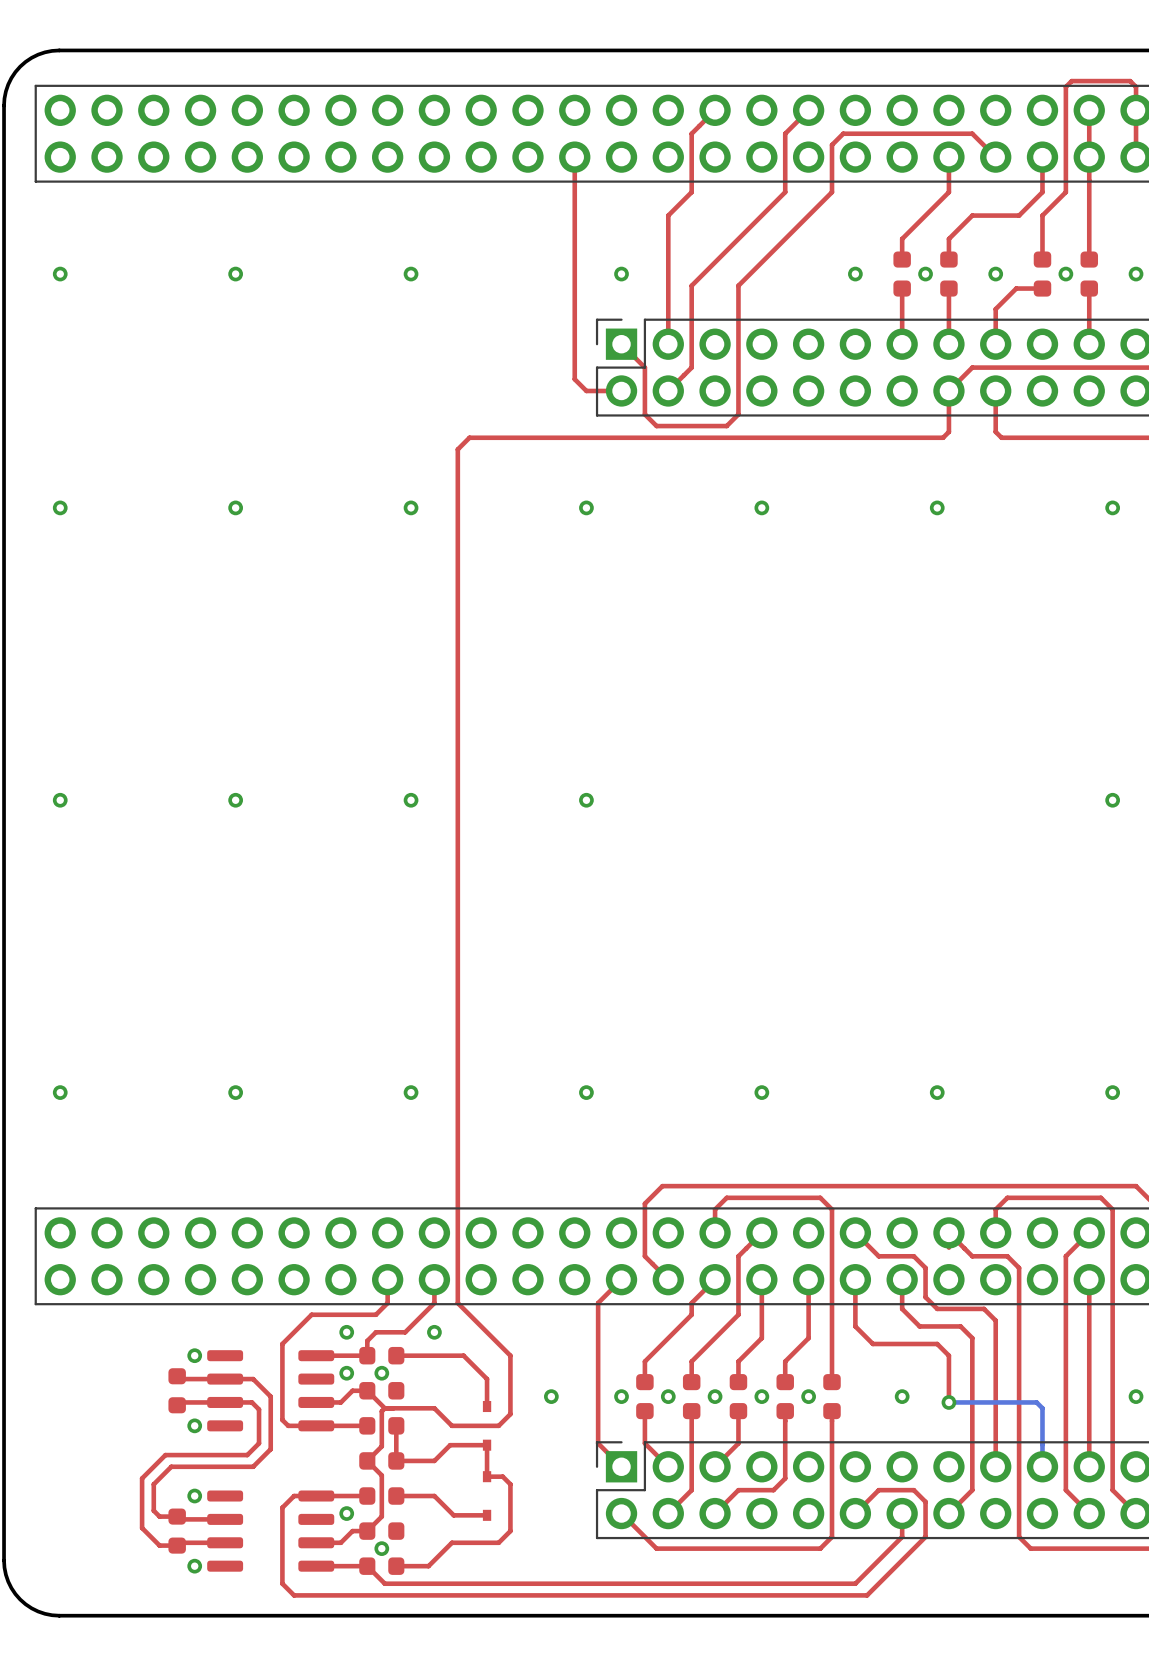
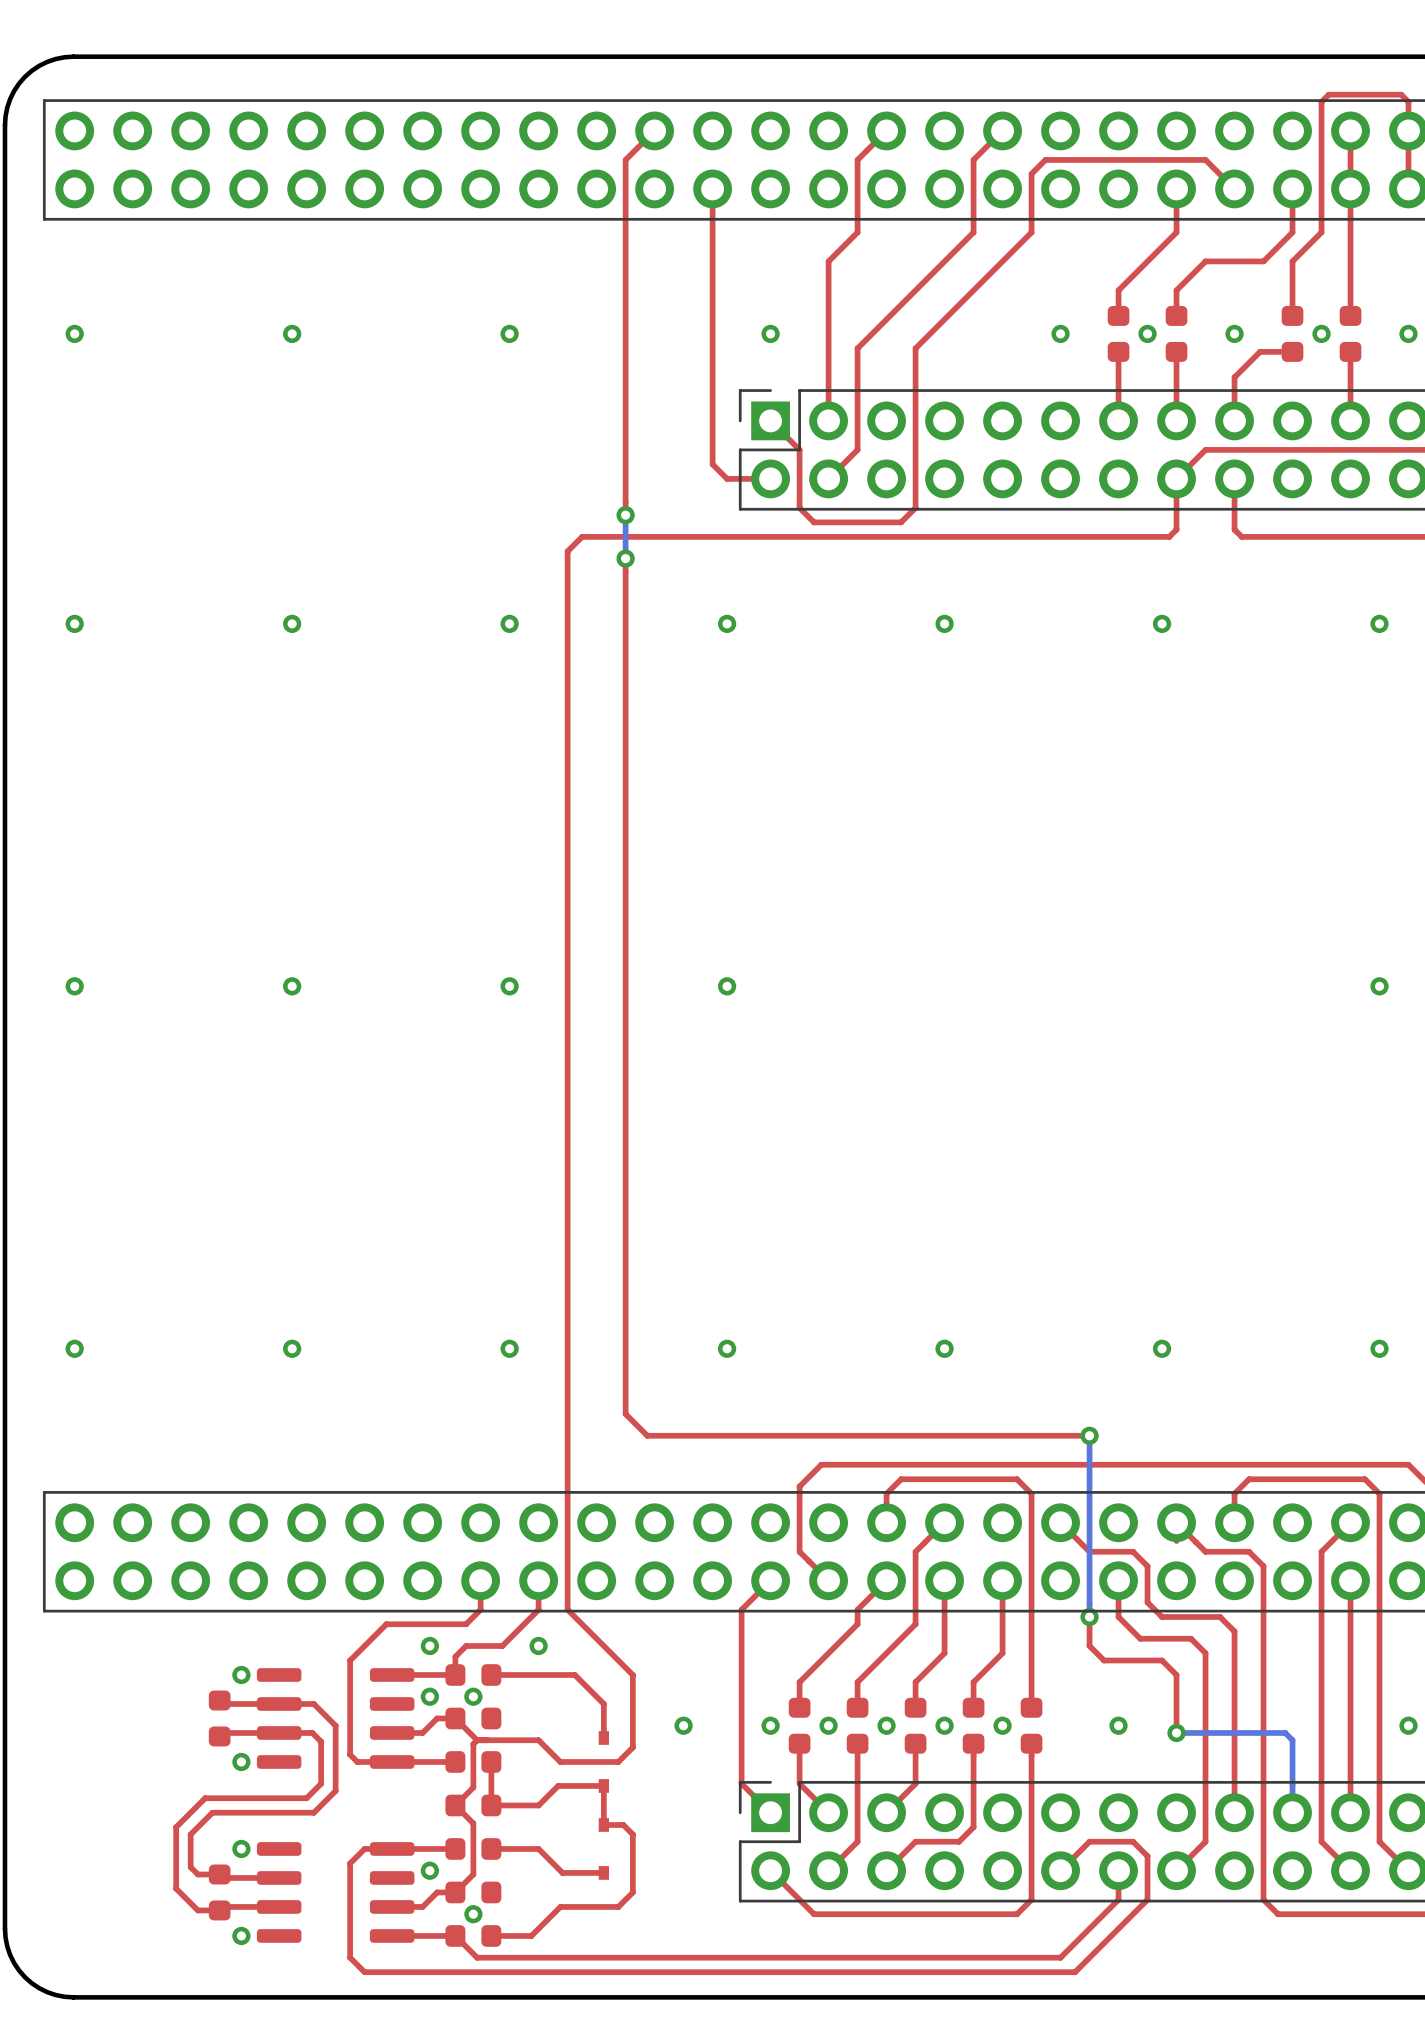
top track: none -> (654, 130) (625, 159) (625, 515)
bottom track: none -> (625, 515) (625, 558)
via: none -> (625, 515)
top track: none -> (625, 558) (625, 1414) (647, 1435) (1089, 1435)
via: none -> (625, 558)
bottom track: none -> (1089, 1435) (1089, 1617)
via: none -> (1089, 1435)
top track: (855, 1279) (855, 1326) (872, 1343) (890, 1343) -> (1089, 1617) (1089, 1645) (1104, 1660)
via: none -> (1089, 1617)

